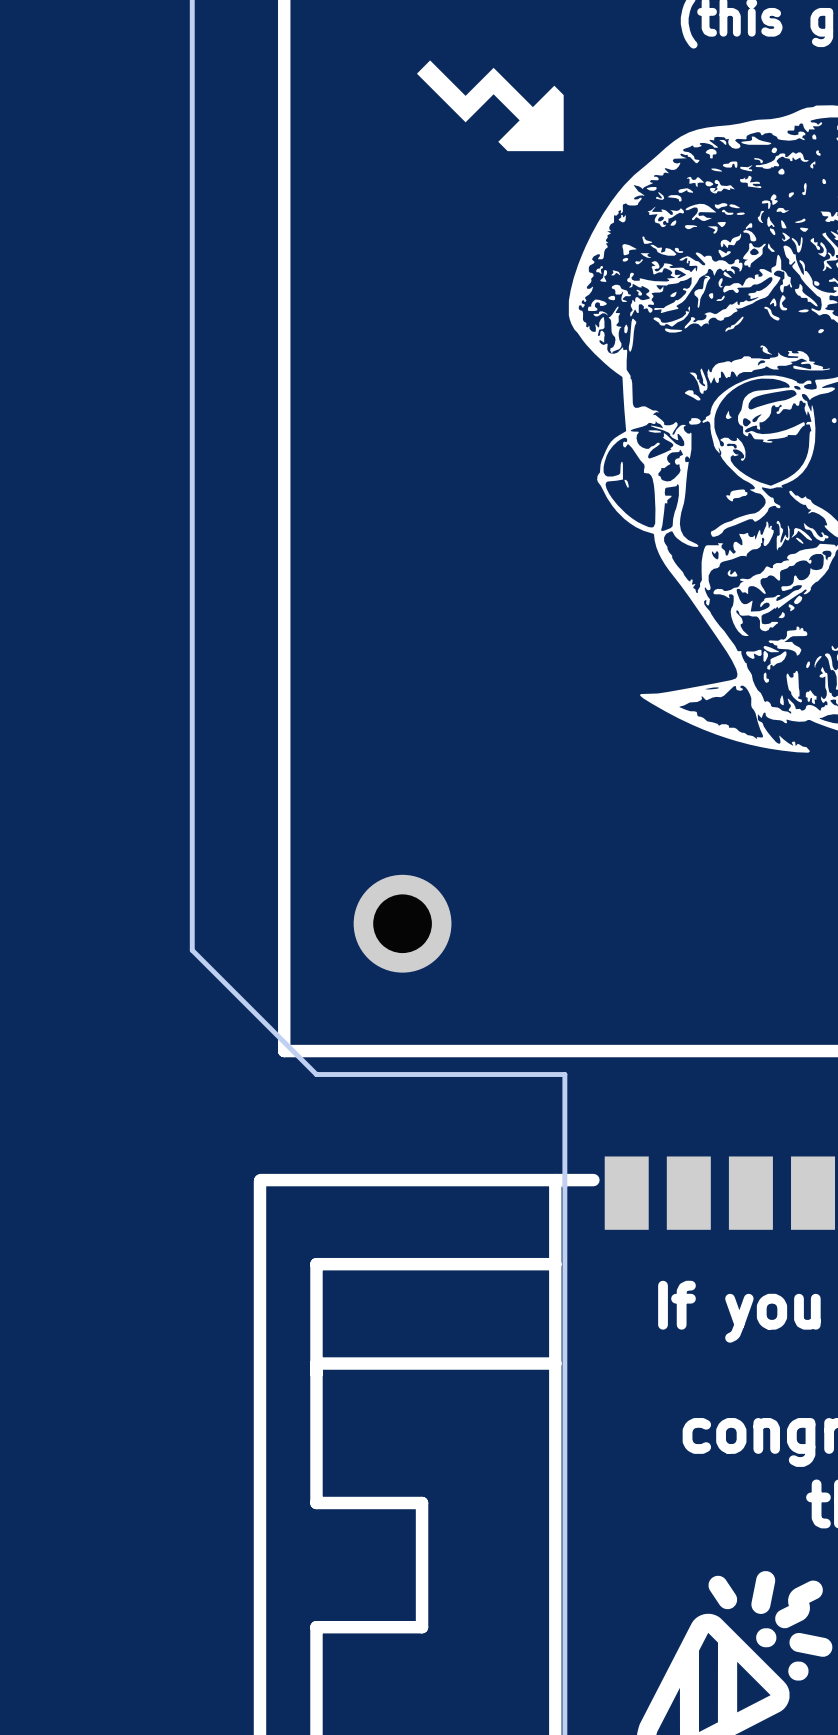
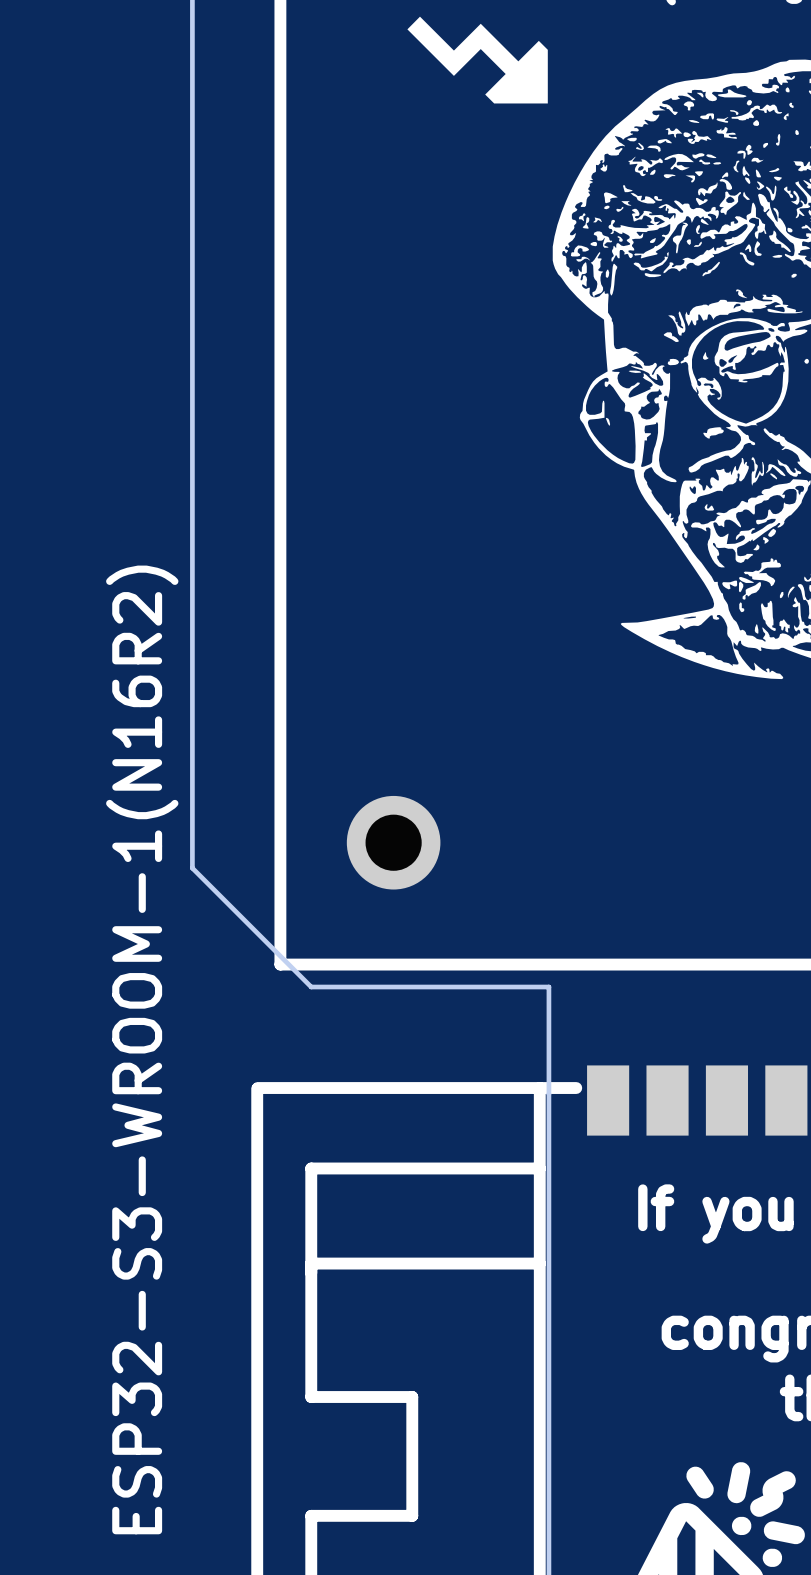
part value: none -> ESP32-S3-WROOM-1(N16R2) (142, 1049)

